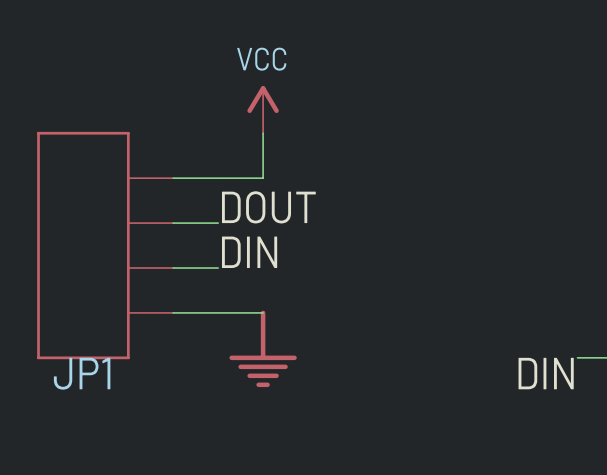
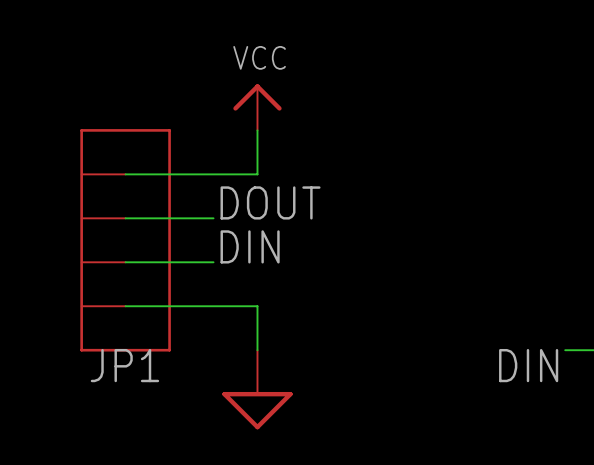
power symbol shape: [247, 86, 279, 134] -> [233, 84, 282, 131]
JP1 symbol: [37, 131, 174, 360] -> [80, 129, 171, 352]
power symbol: (263, 348) -> none
power symbol: none -> (257, 389)

